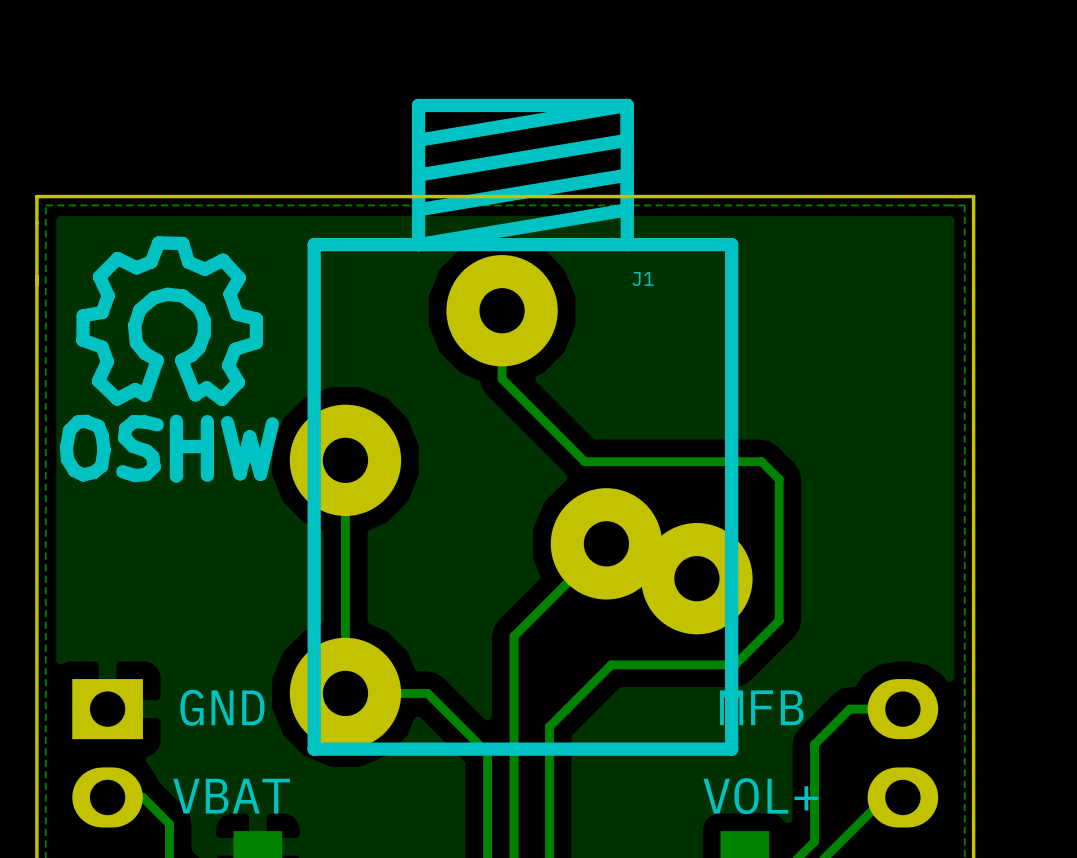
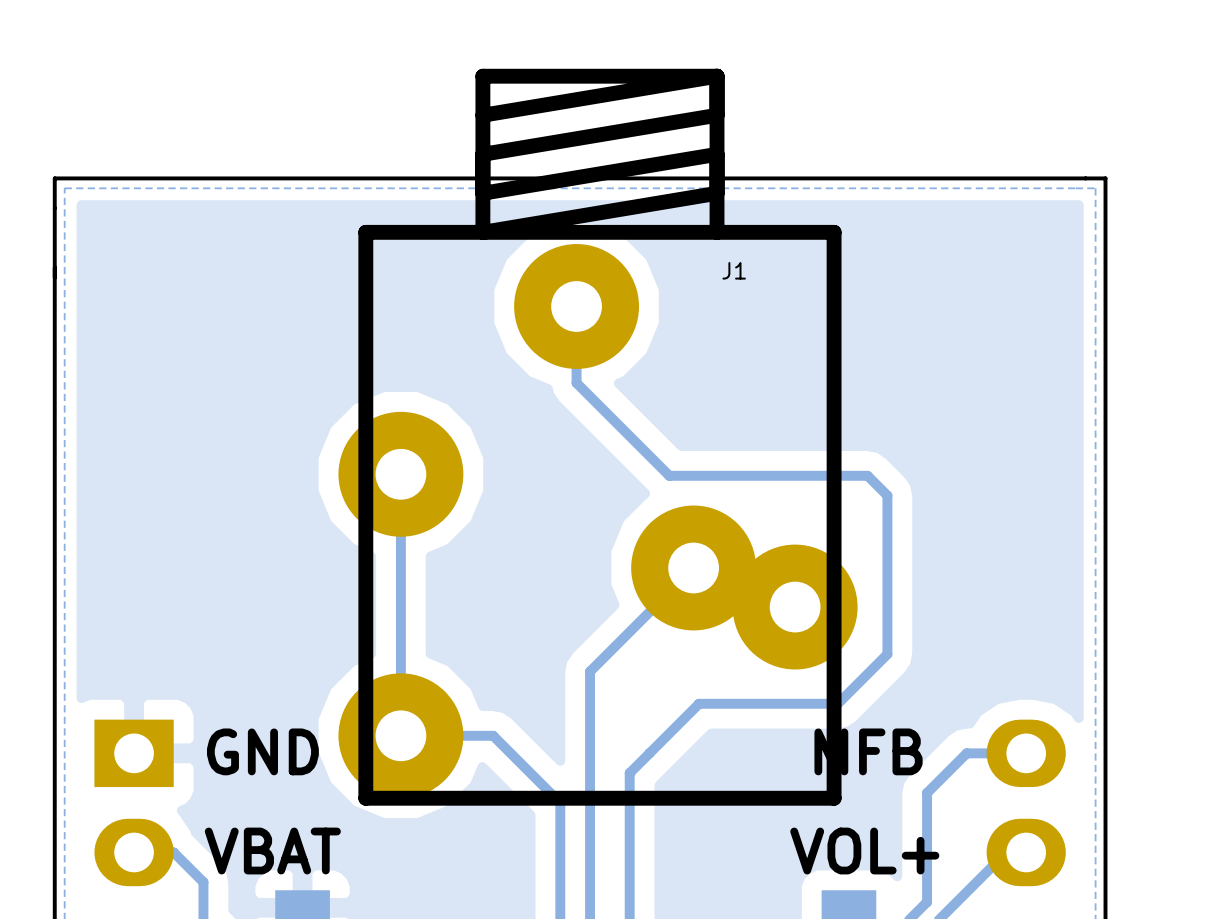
drawing: [59, 236, 280, 483] -> none

